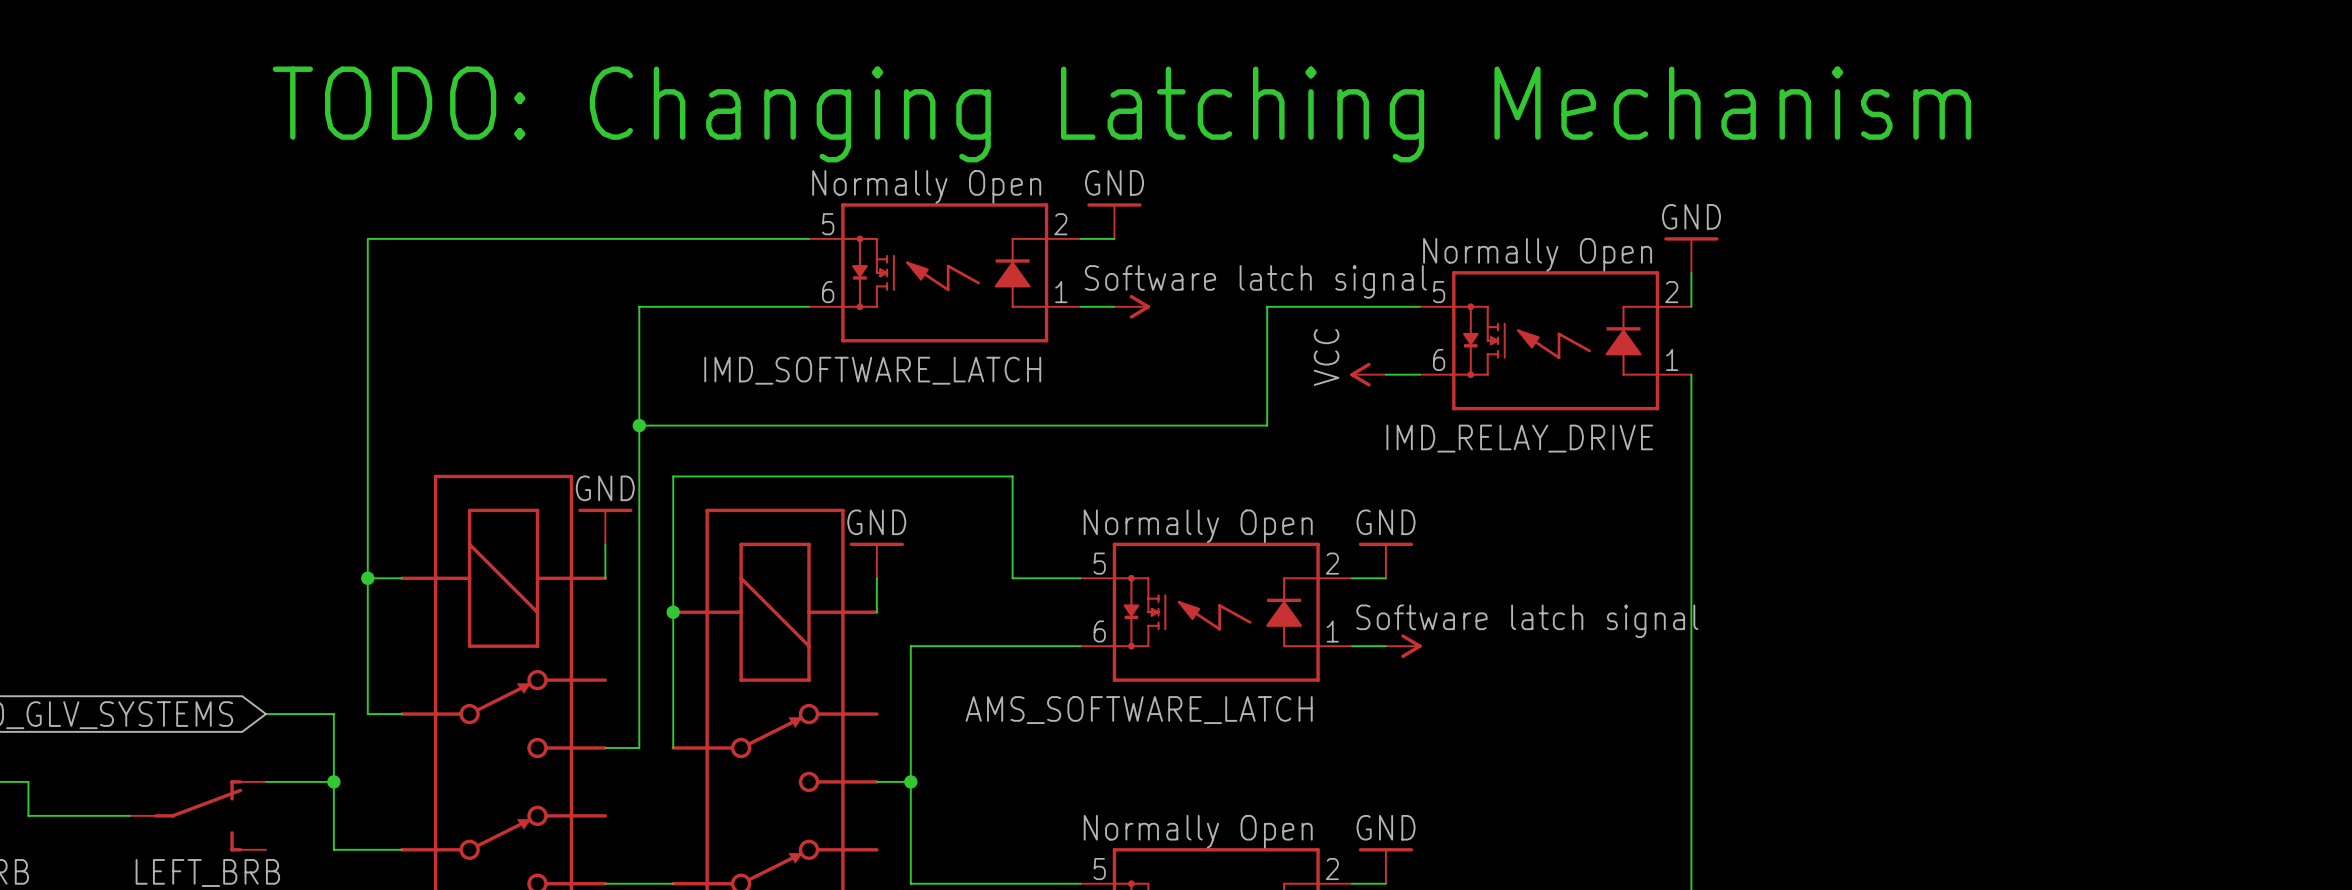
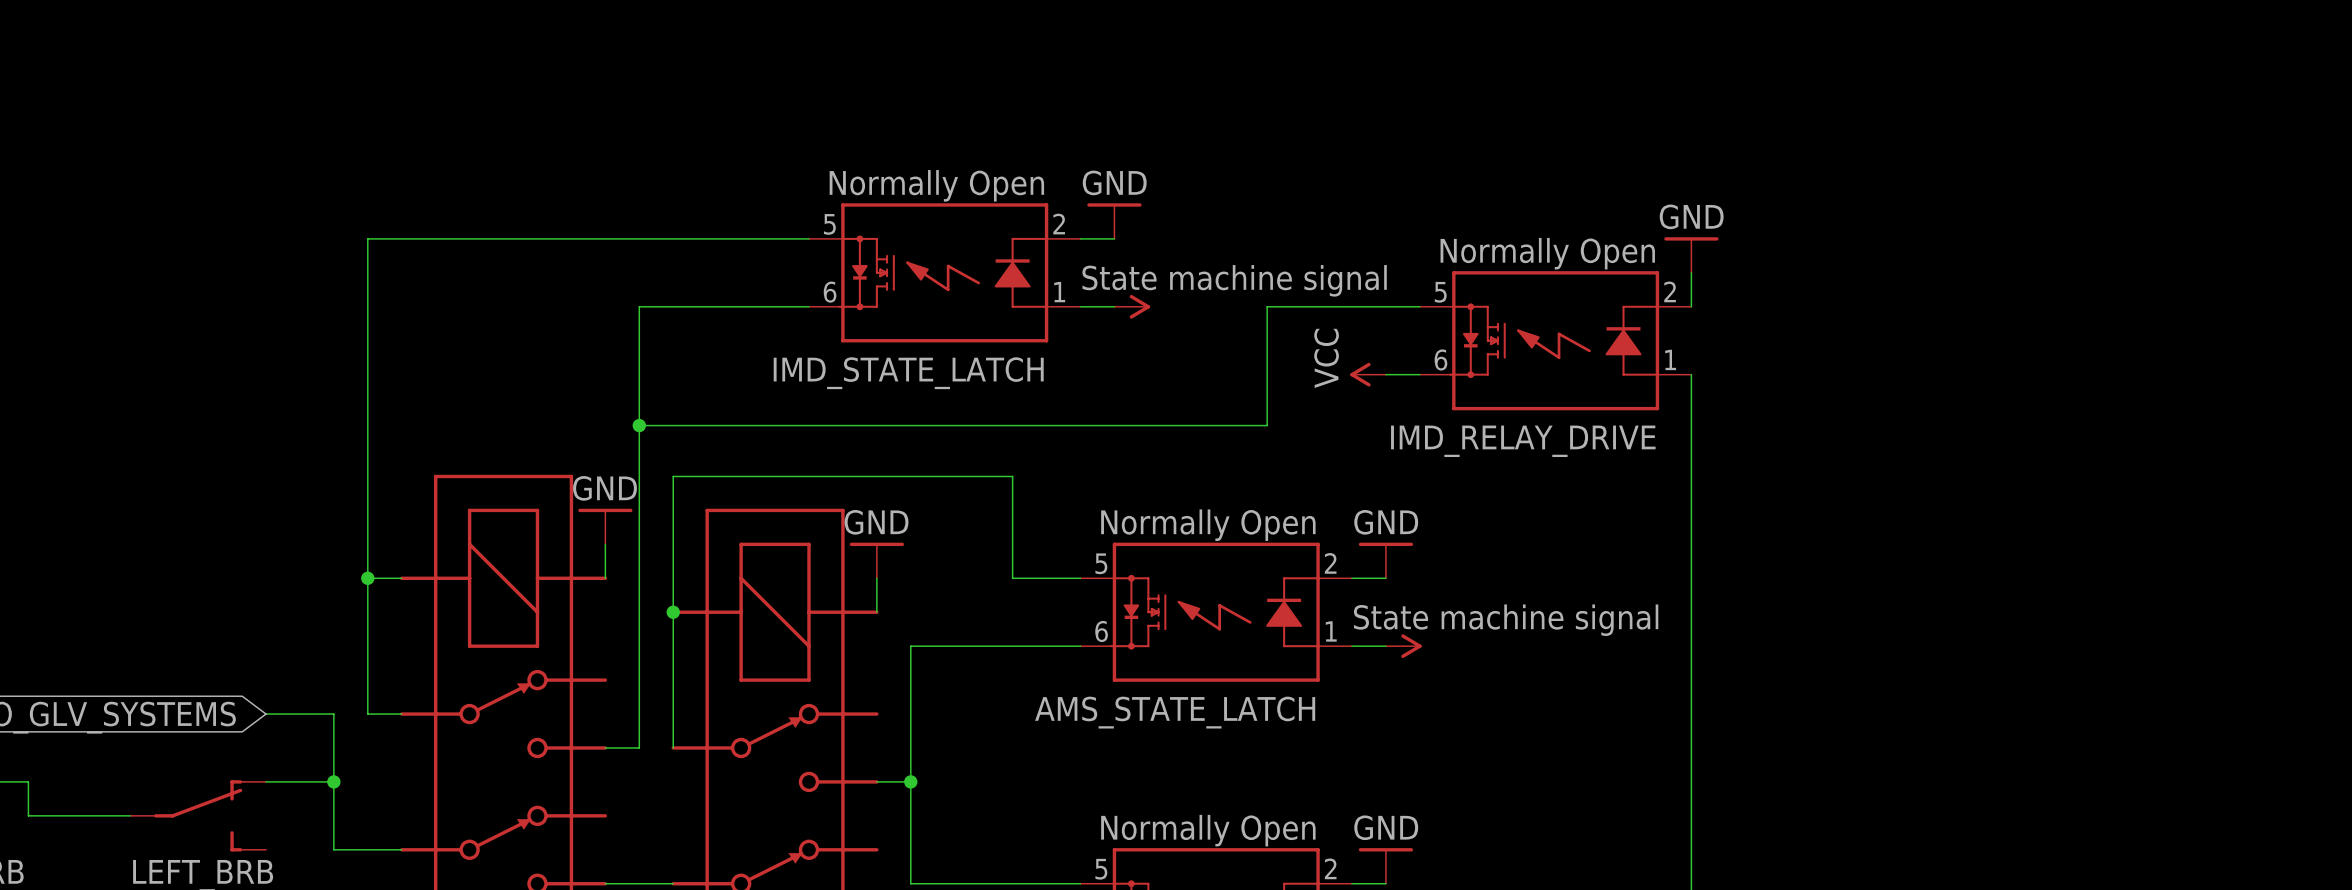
text: TODO: Changing Latching Mechanism (1121, 114) -> none
text: Software latch signal (1255, 281) -> State machine signal (1234, 280)
IMD_SOFTWARE_LATCH name: IMD_SOFTWARE_LATCH (872, 370) -> IMD_STATE_LATCH (908, 373)
text: Software latch signal (1527, 621) -> State machine signal (1506, 620)
AMS_SOFTWARE_LATCH name: AMS_SOFTWARE_LATCH (1139, 710) -> AMS_STATE_LATCH (1175, 712)

